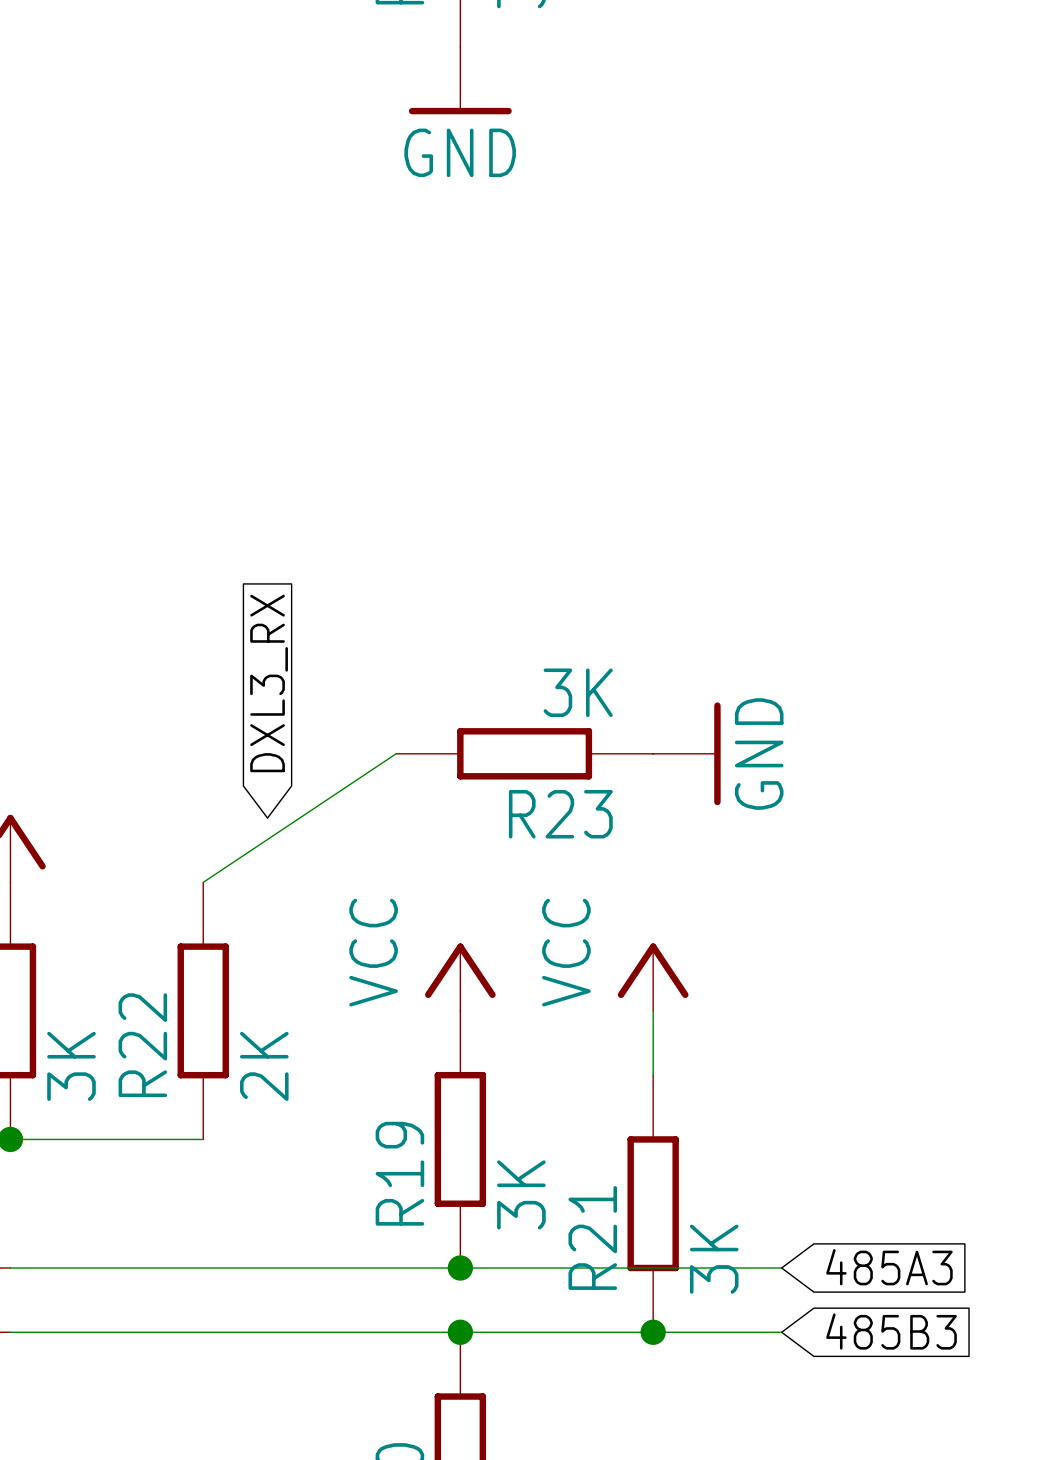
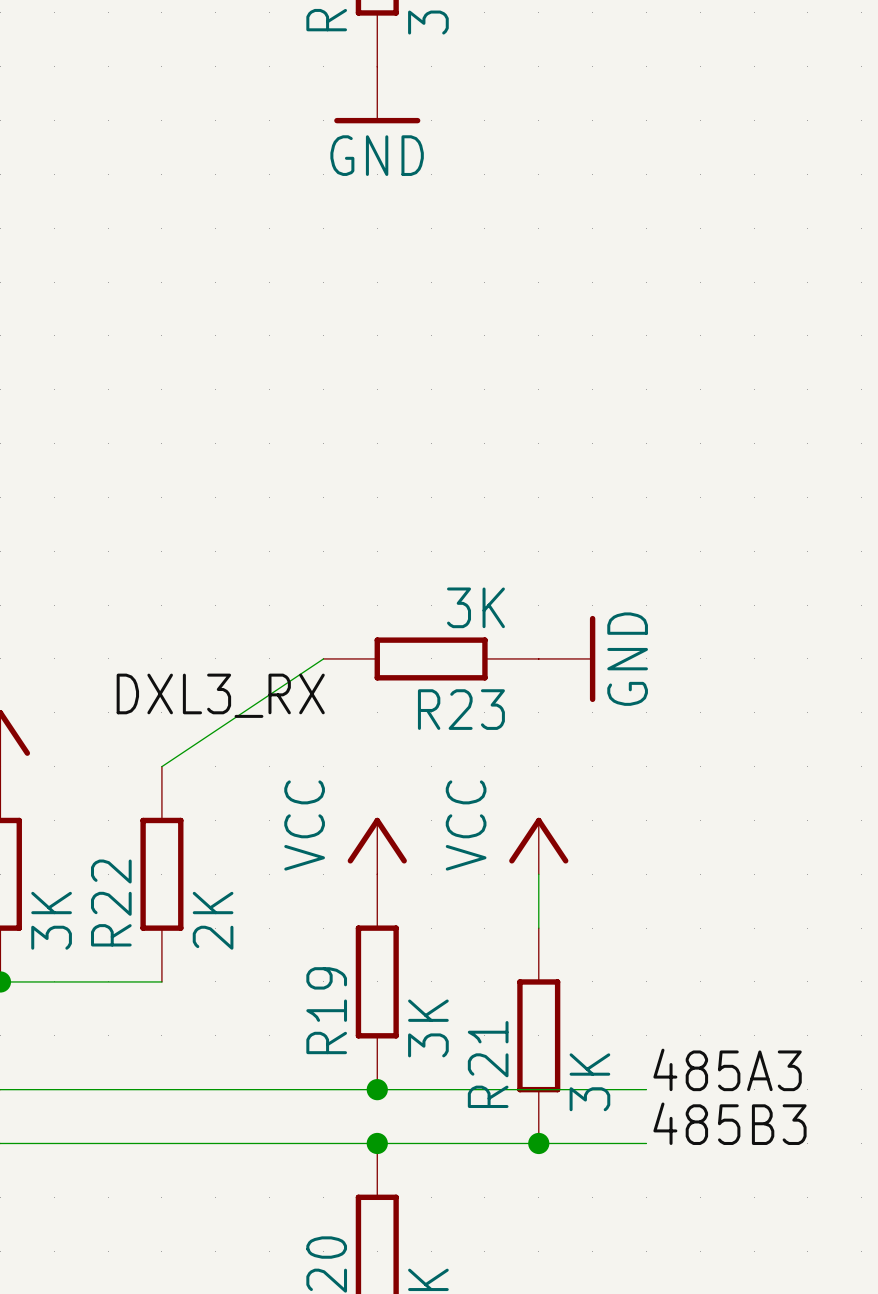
global label: DXL3_RX (269, 683) -> none
label: none -> DXL3_RX (220, 695)
label: none -> 485A3 (727, 1069)
global label: 485A3 (889, 1267) -> none
label: none -> 485B3 (729, 1123)
global label: 485B3 (891, 1331) -> none

